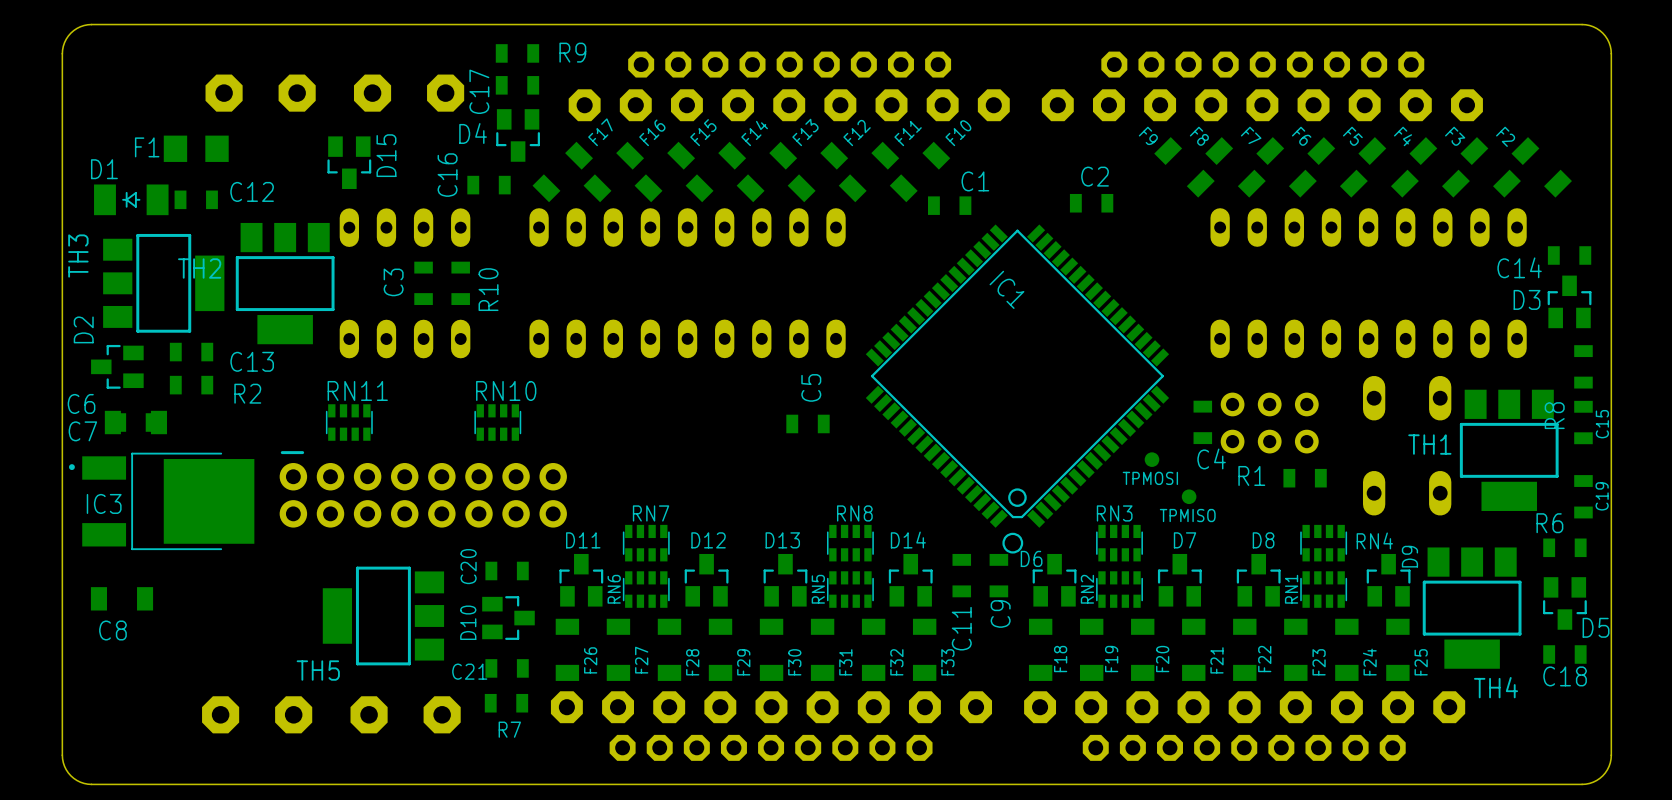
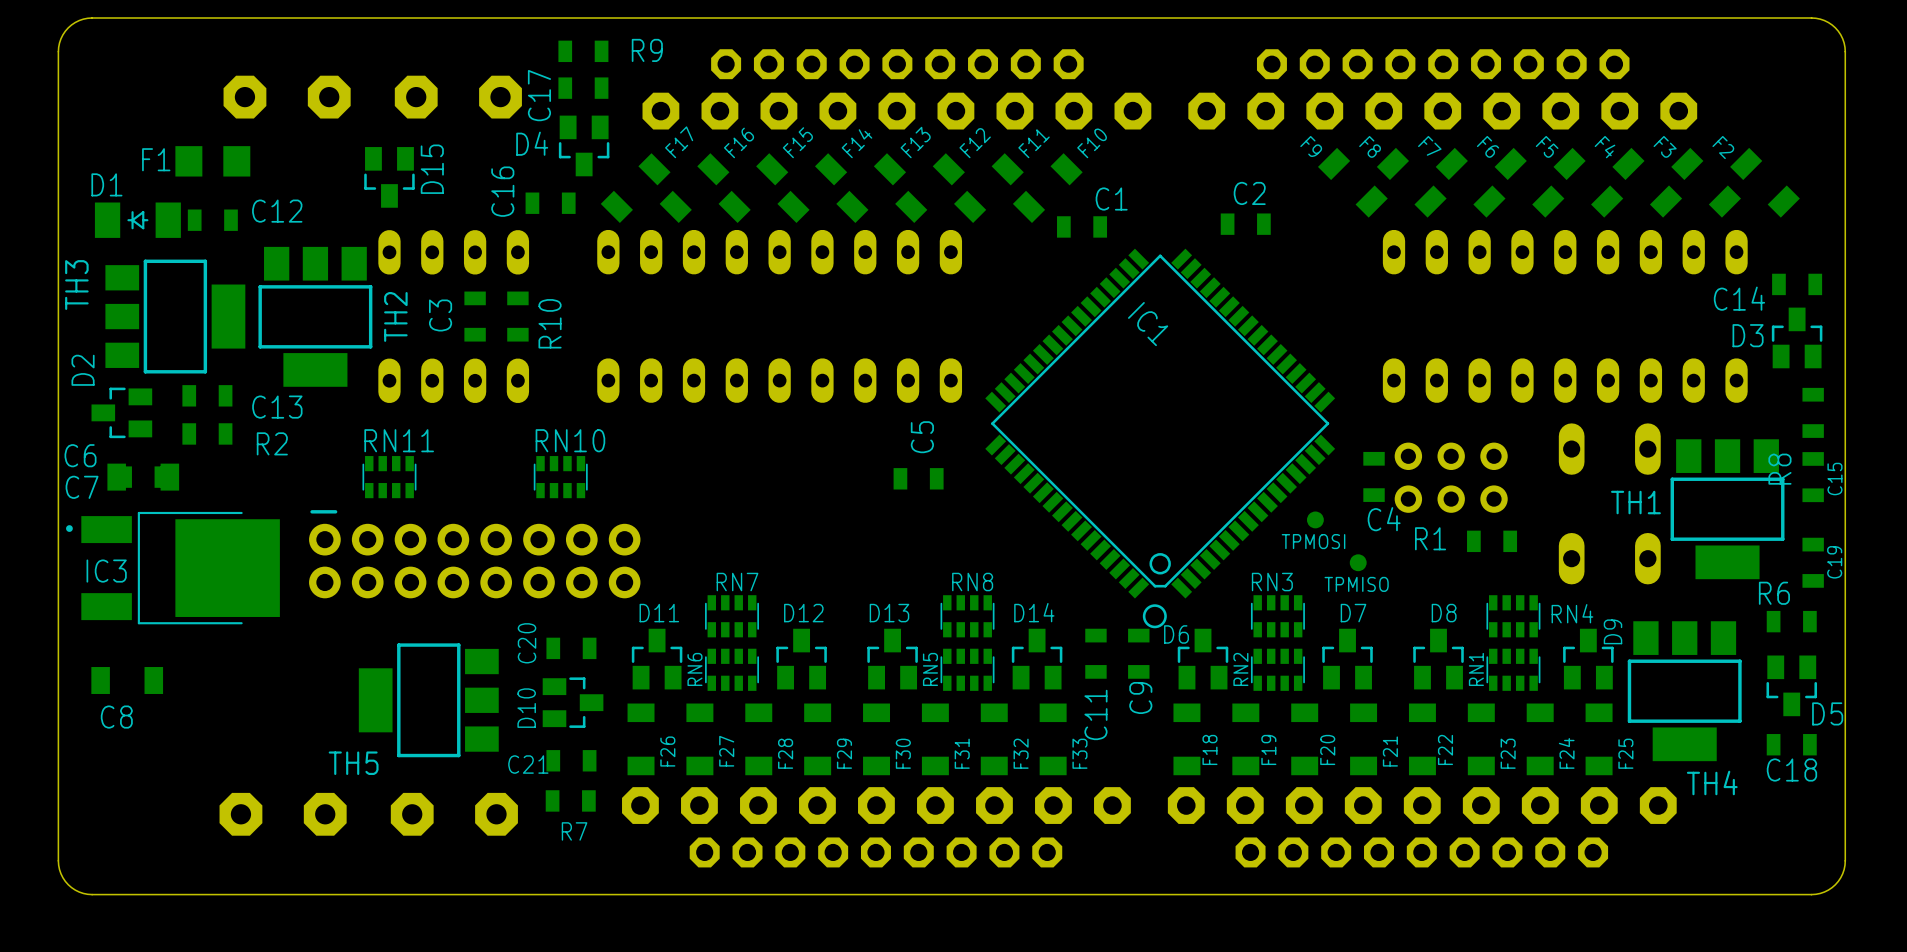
TH2 name rotation: 0° (199, 268) -> 90° counterclockwise (395, 316)
TH2 name position: TH2 (199, 268) -> TH2 (395, 316)

